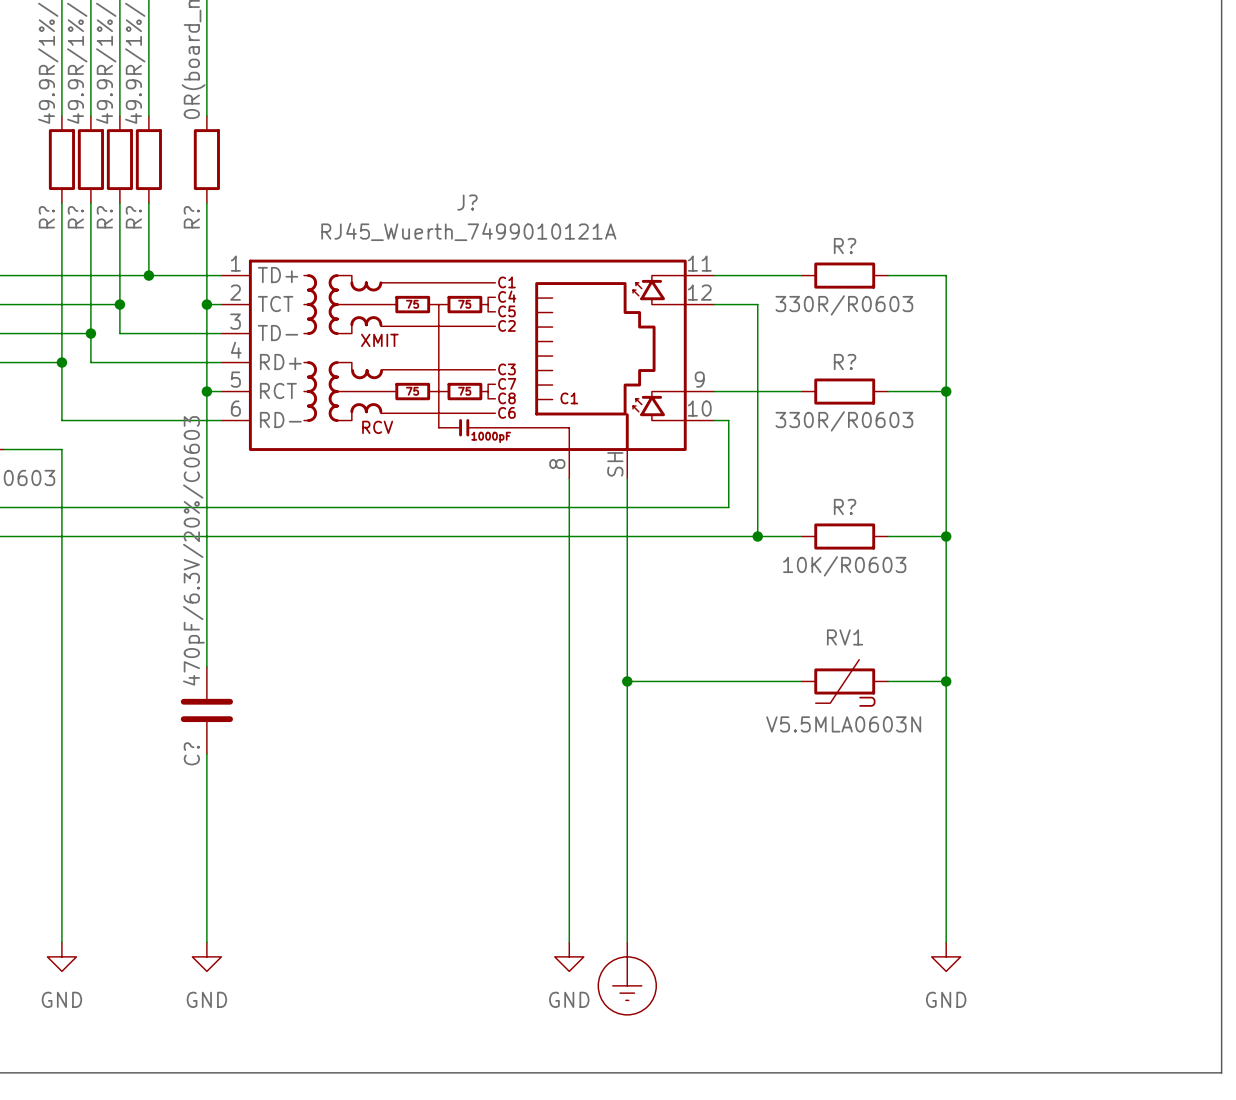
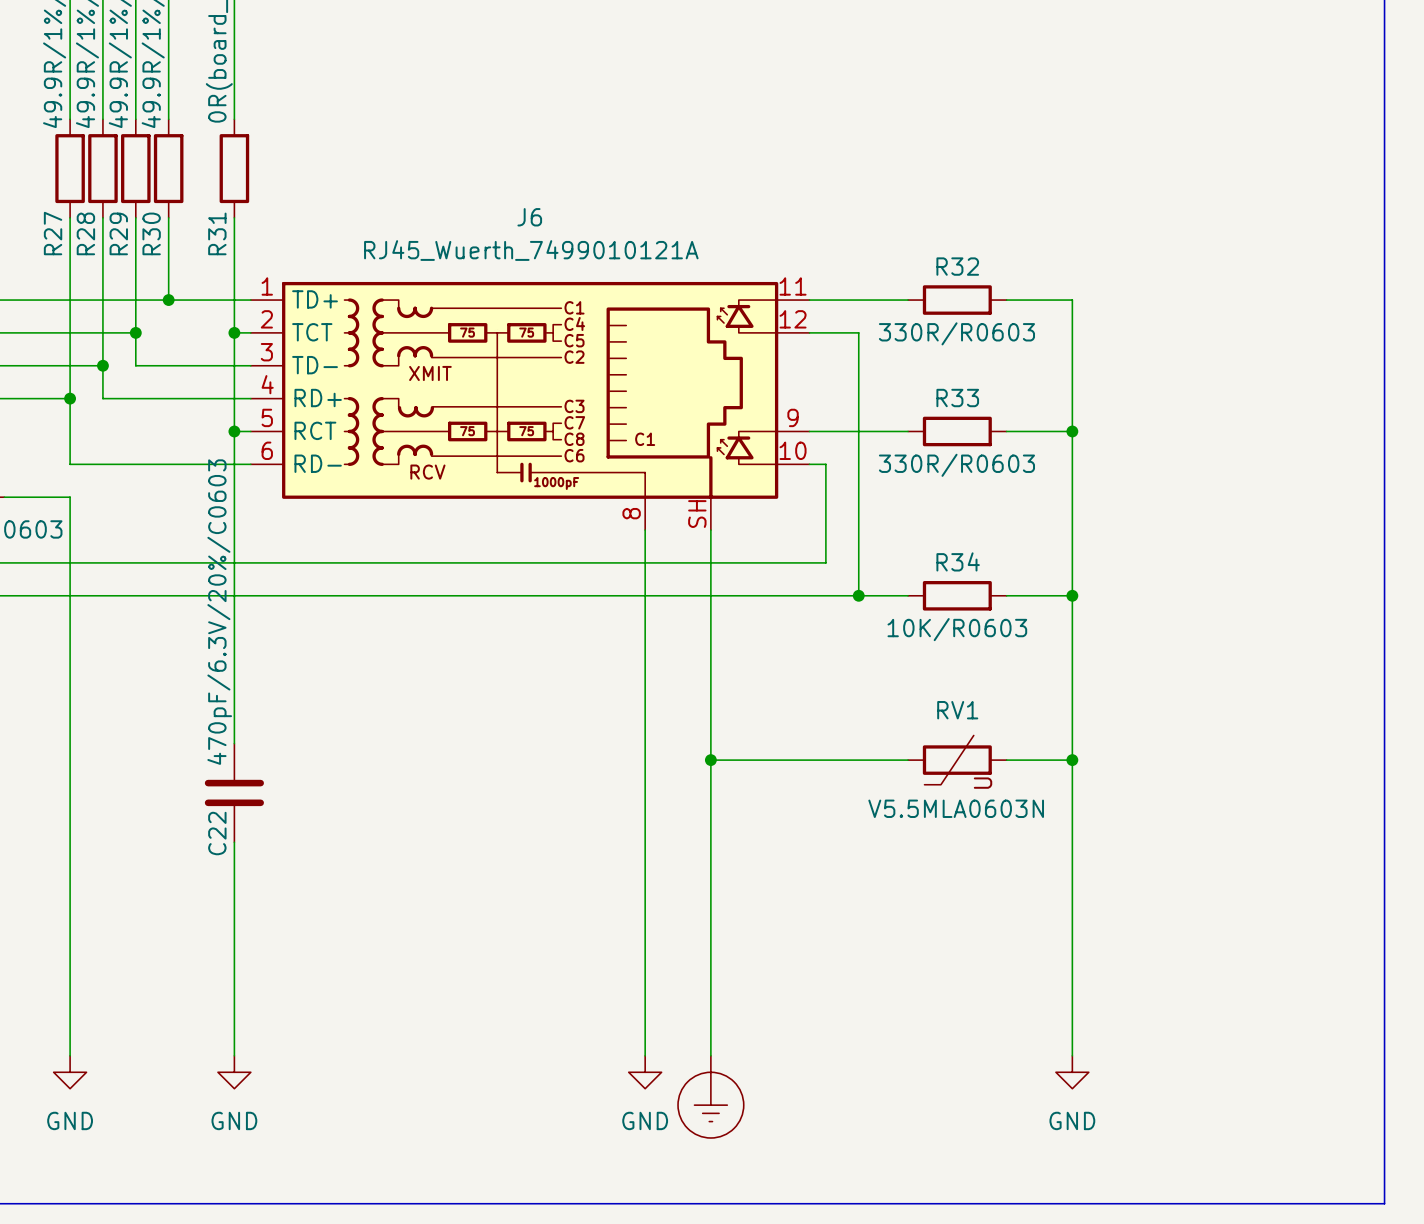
J? name: J? (467, 202) -> J6 (529, 217)
R? name: R? (46, 217) -> R27 (53, 233)
R? name: R? (75, 217) -> R28 (85, 233)
R? name: R? (104, 217) -> R29 (118, 233)
R? name: R? (133, 217) -> R30 (151, 233)
R? name: R? (191, 217) -> R31 (217, 233)
R? name: R? (845, 246) -> R32 (957, 266)
R? name: R? (845, 362) -> R33 (957, 398)
R? name: R? (845, 506) -> R34 (958, 561)
C? name: C? (191, 753) -> C22 (217, 833)

